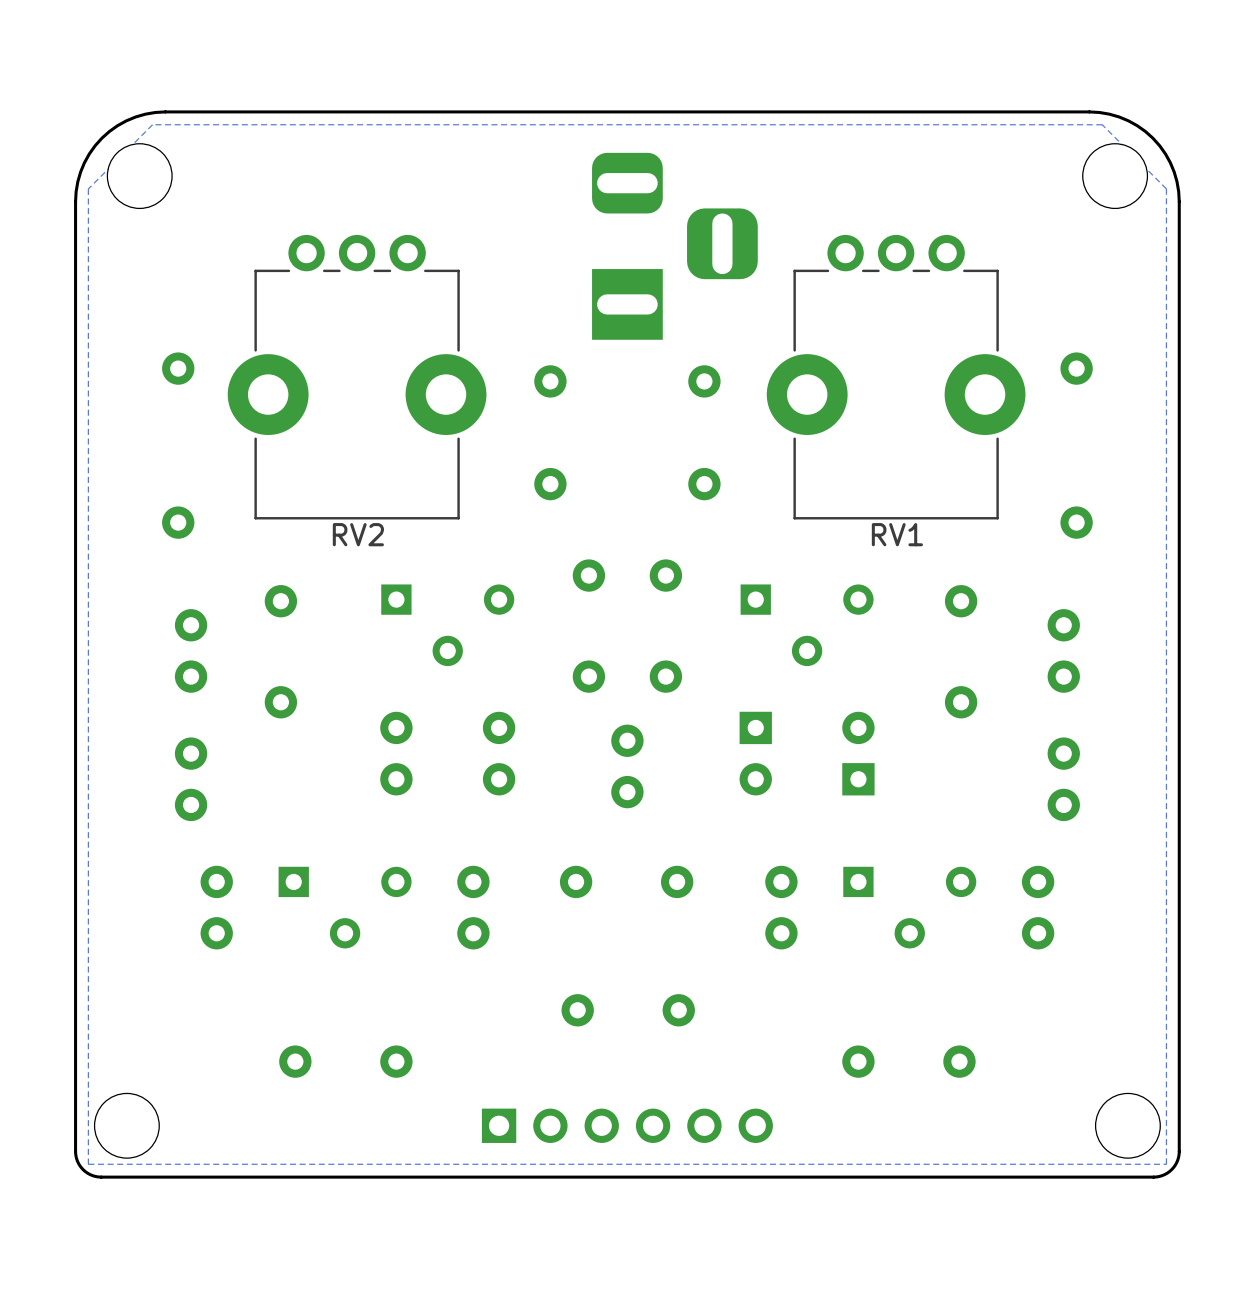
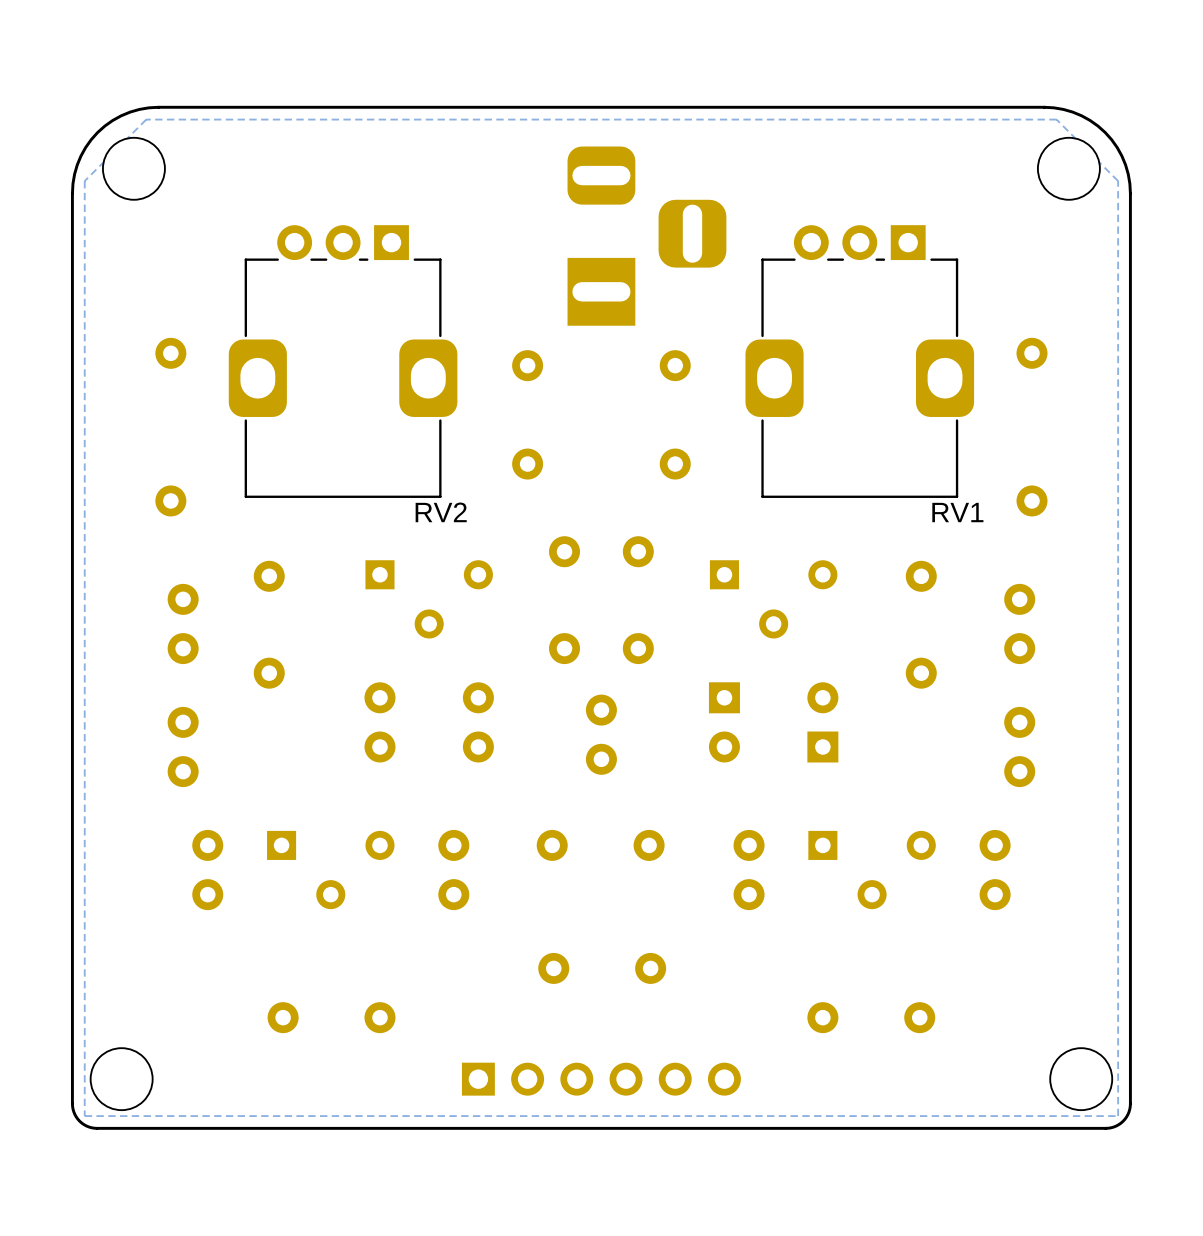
RV2 footprint: [227, 234, 487, 520] -> [228, 225, 458, 498]
RV1 footprint: [766, 234, 1026, 520] -> [745, 225, 975, 498]
RV2 name position: RV2 (358, 534) -> RV2 (441, 512)
RV1 name position: RV1 (897, 534) -> RV1 (957, 512)

